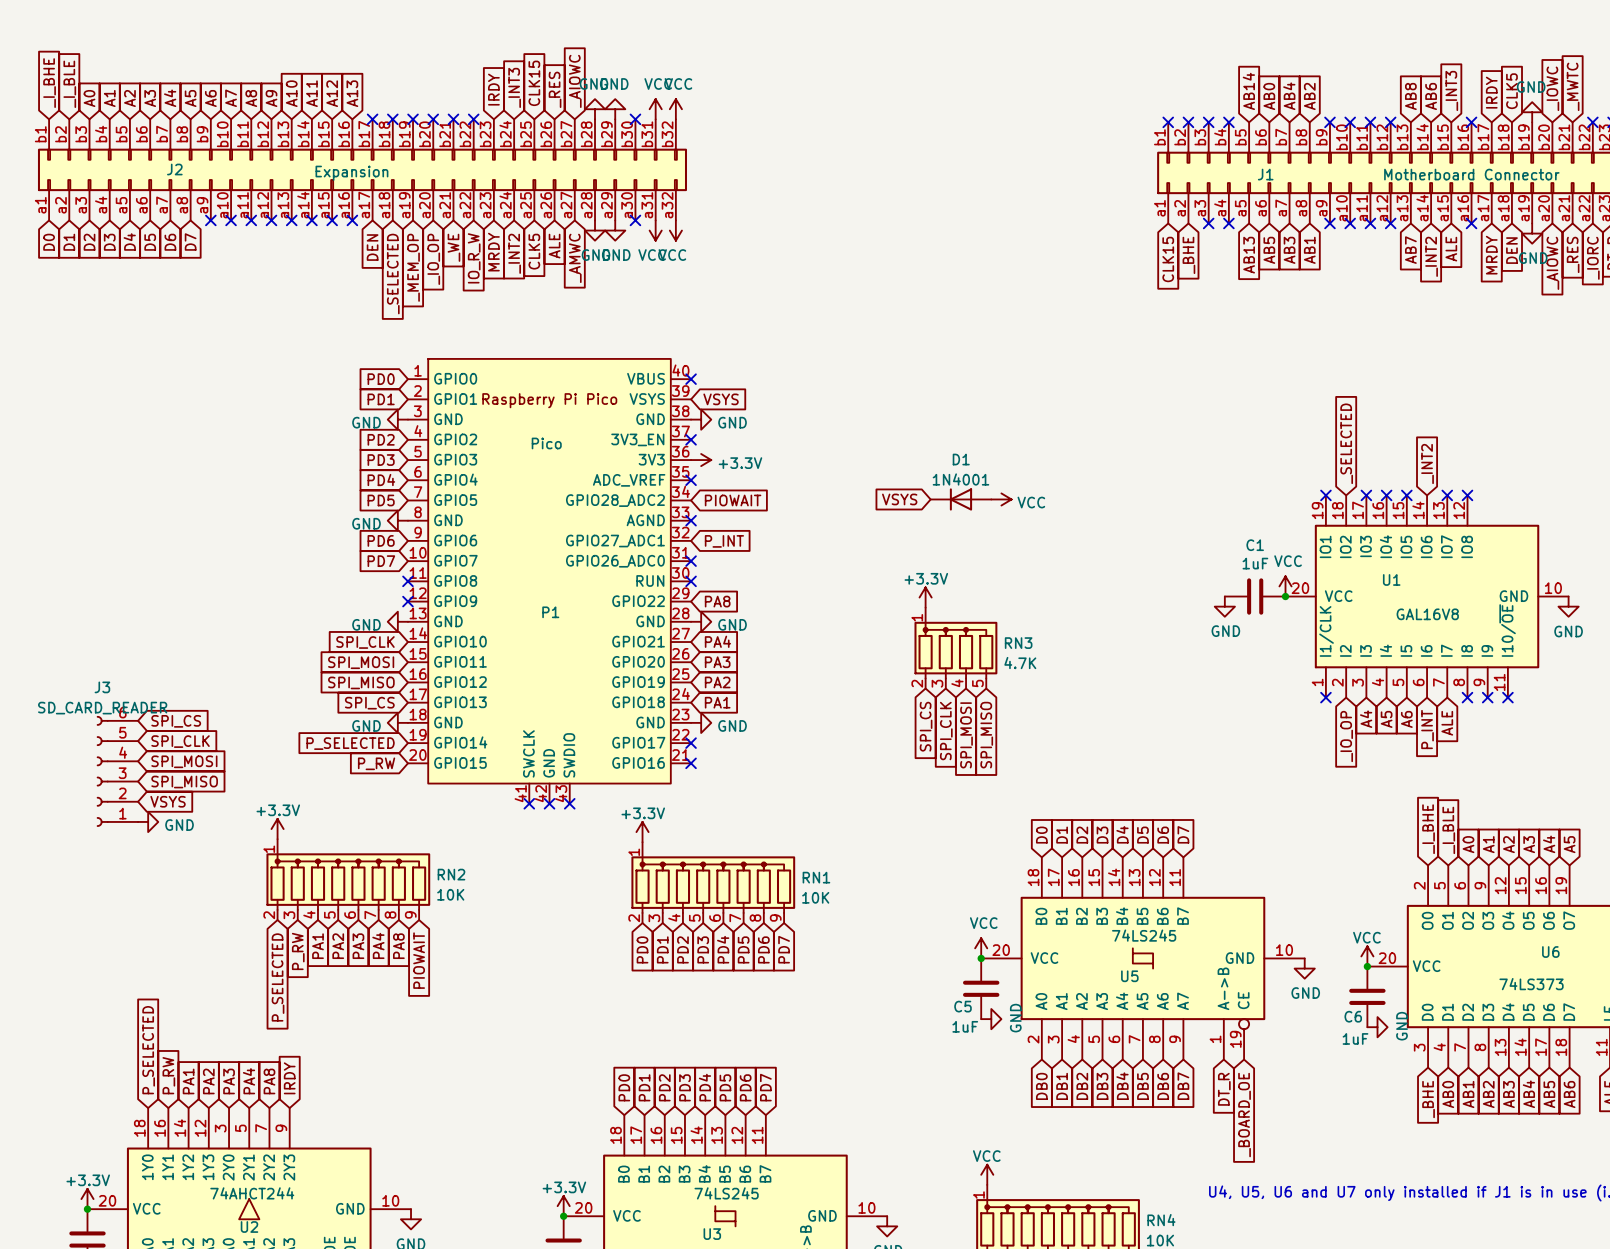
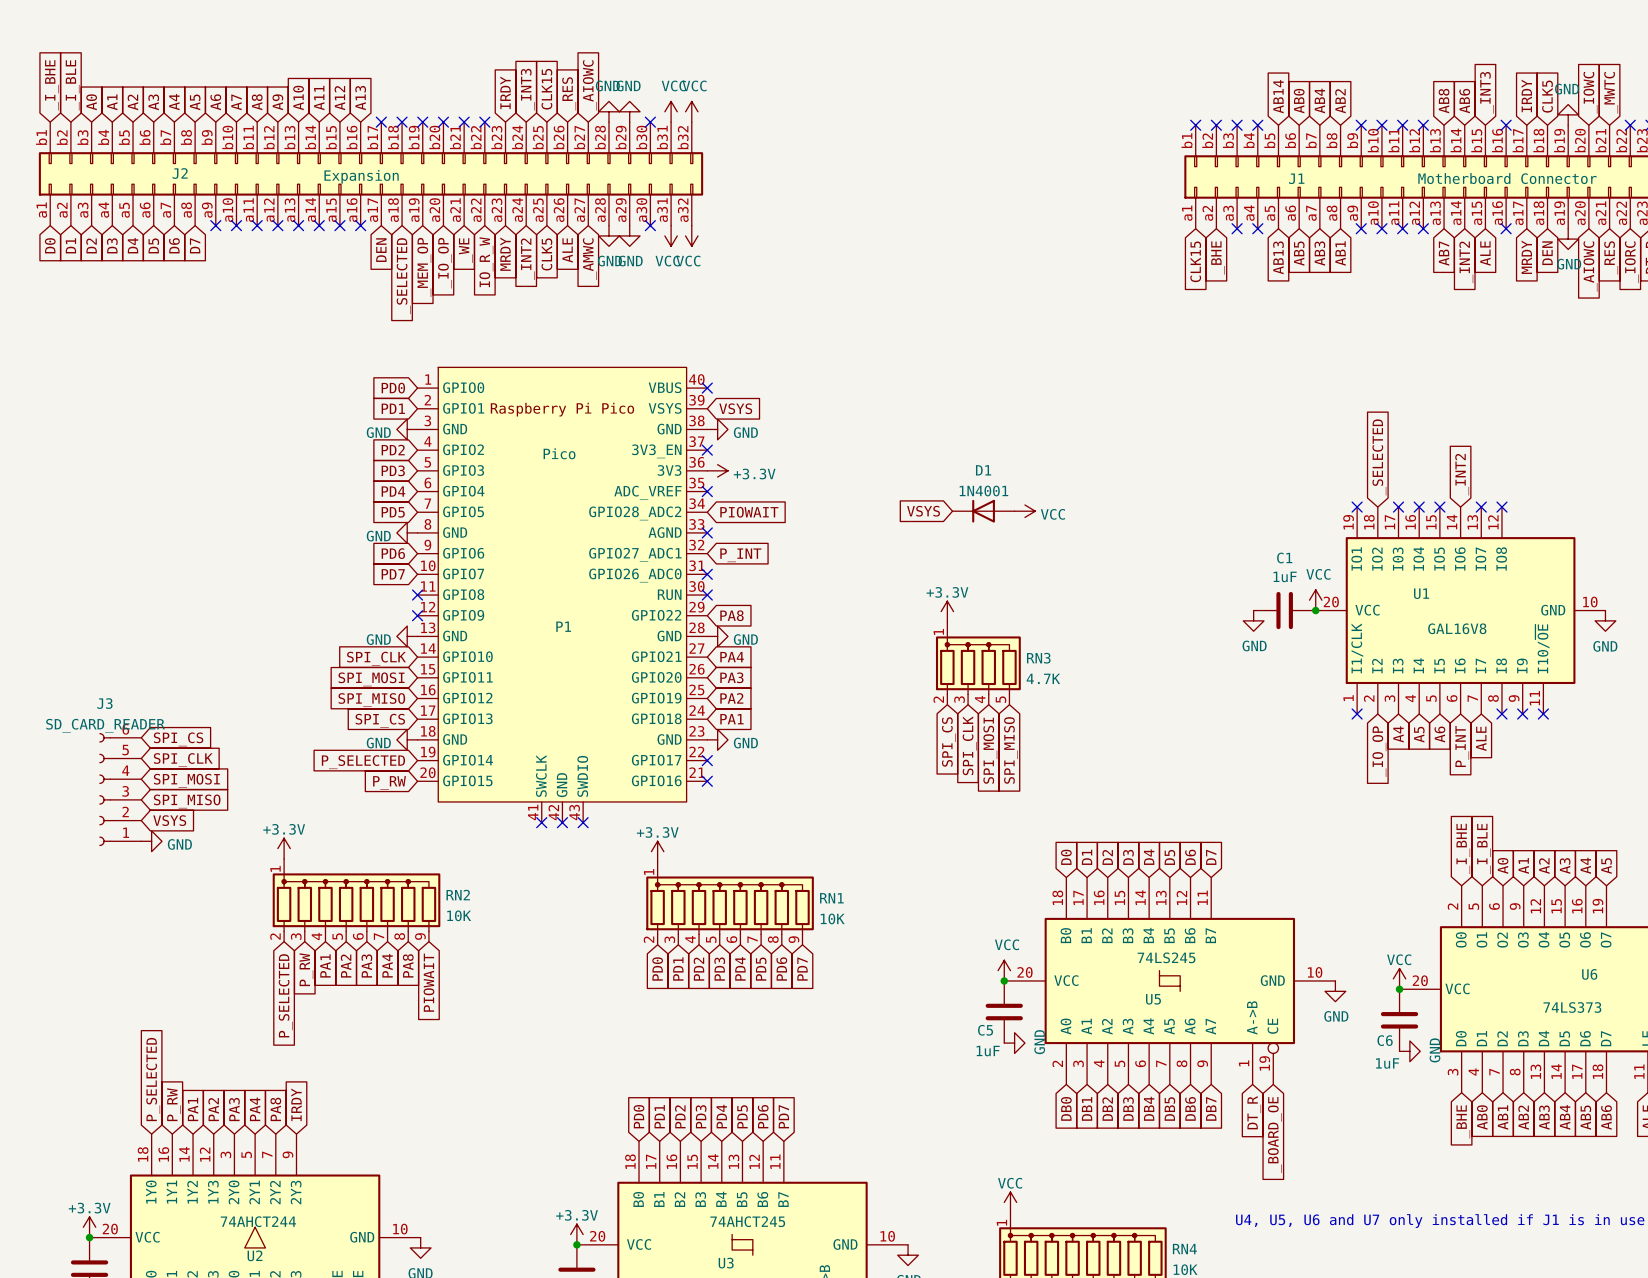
U3 value: 74LS245 (726, 1193) -> 74AHCT245 (747, 1221)

